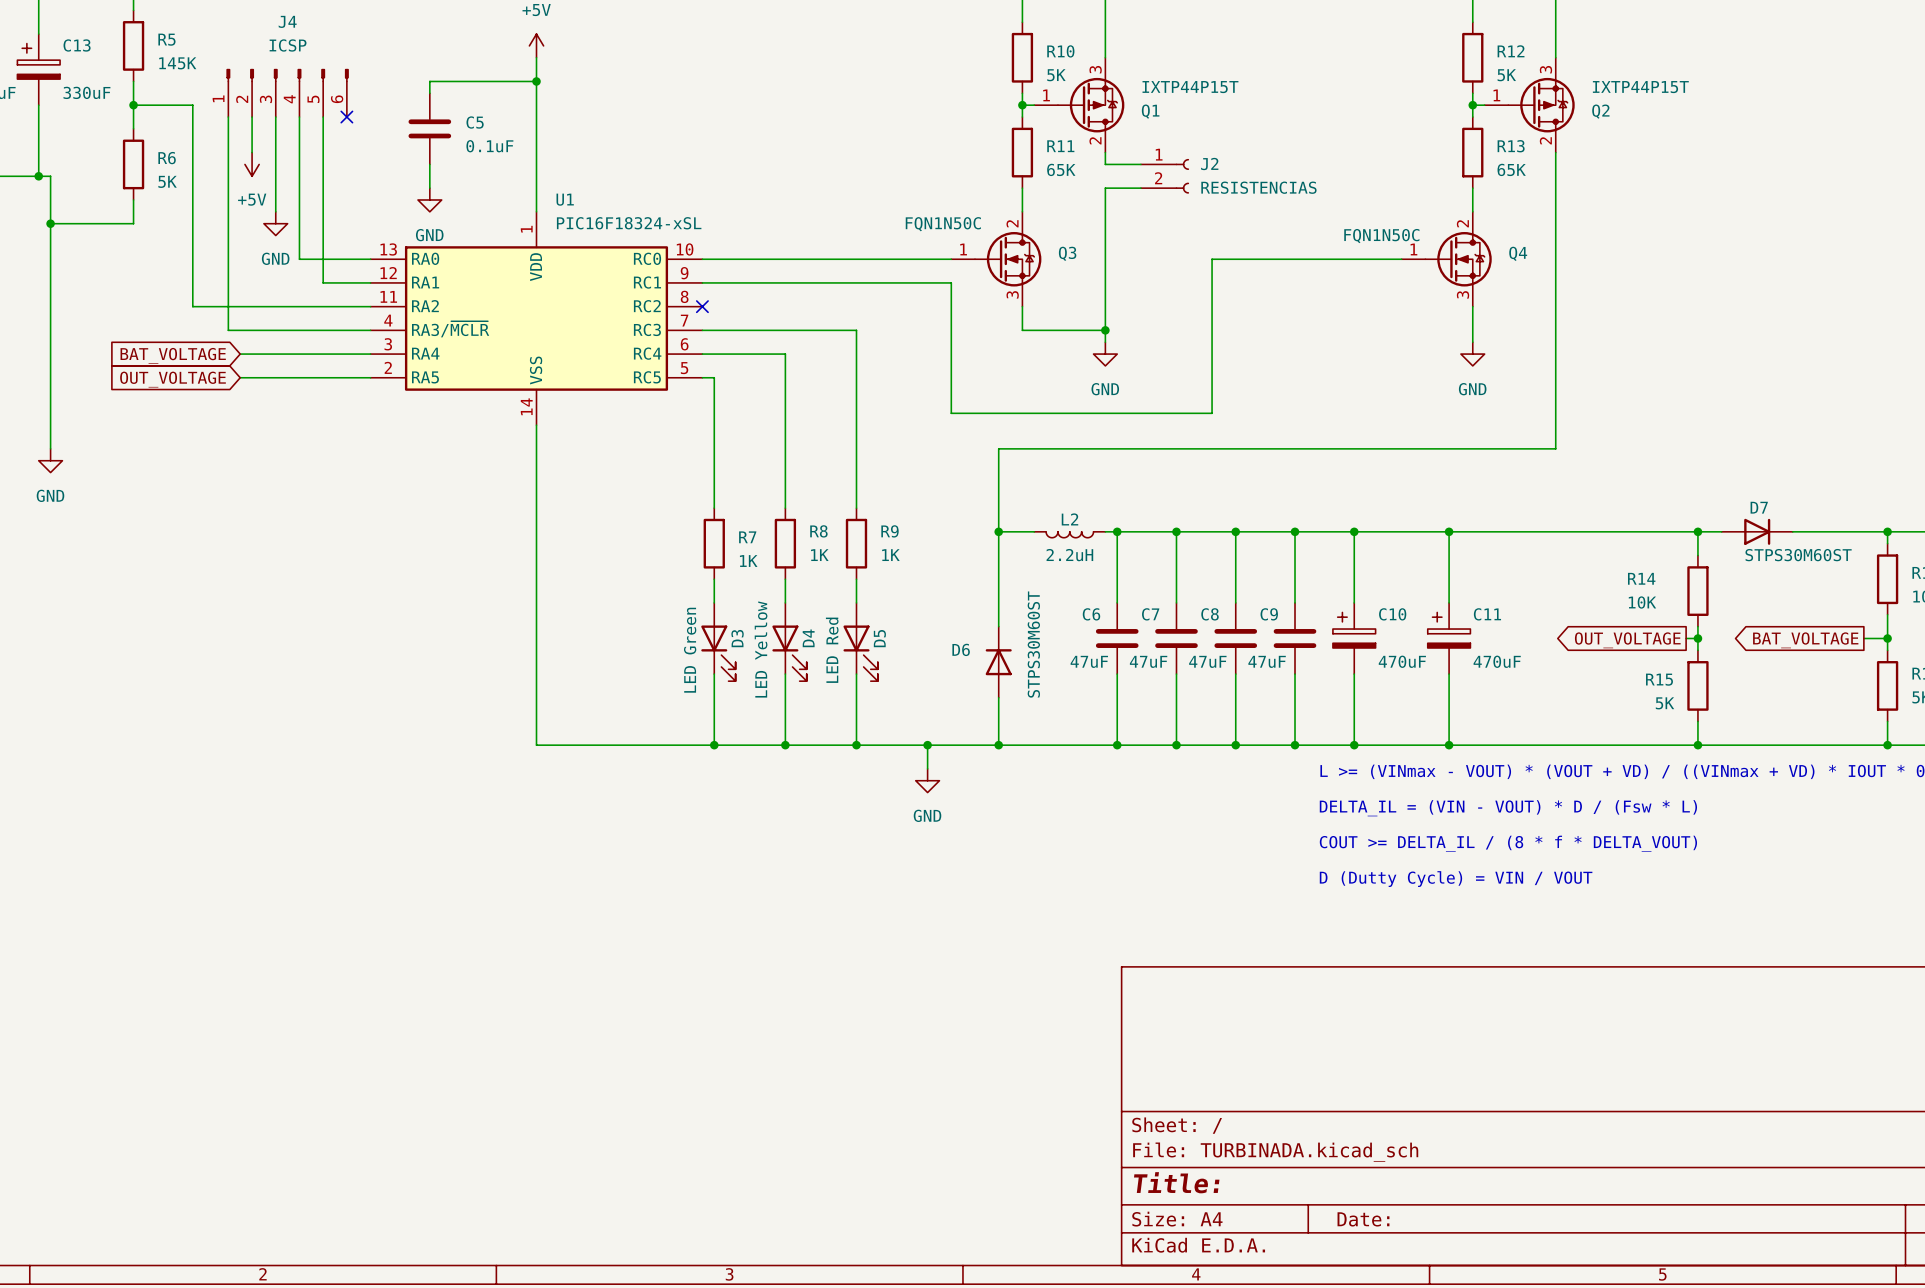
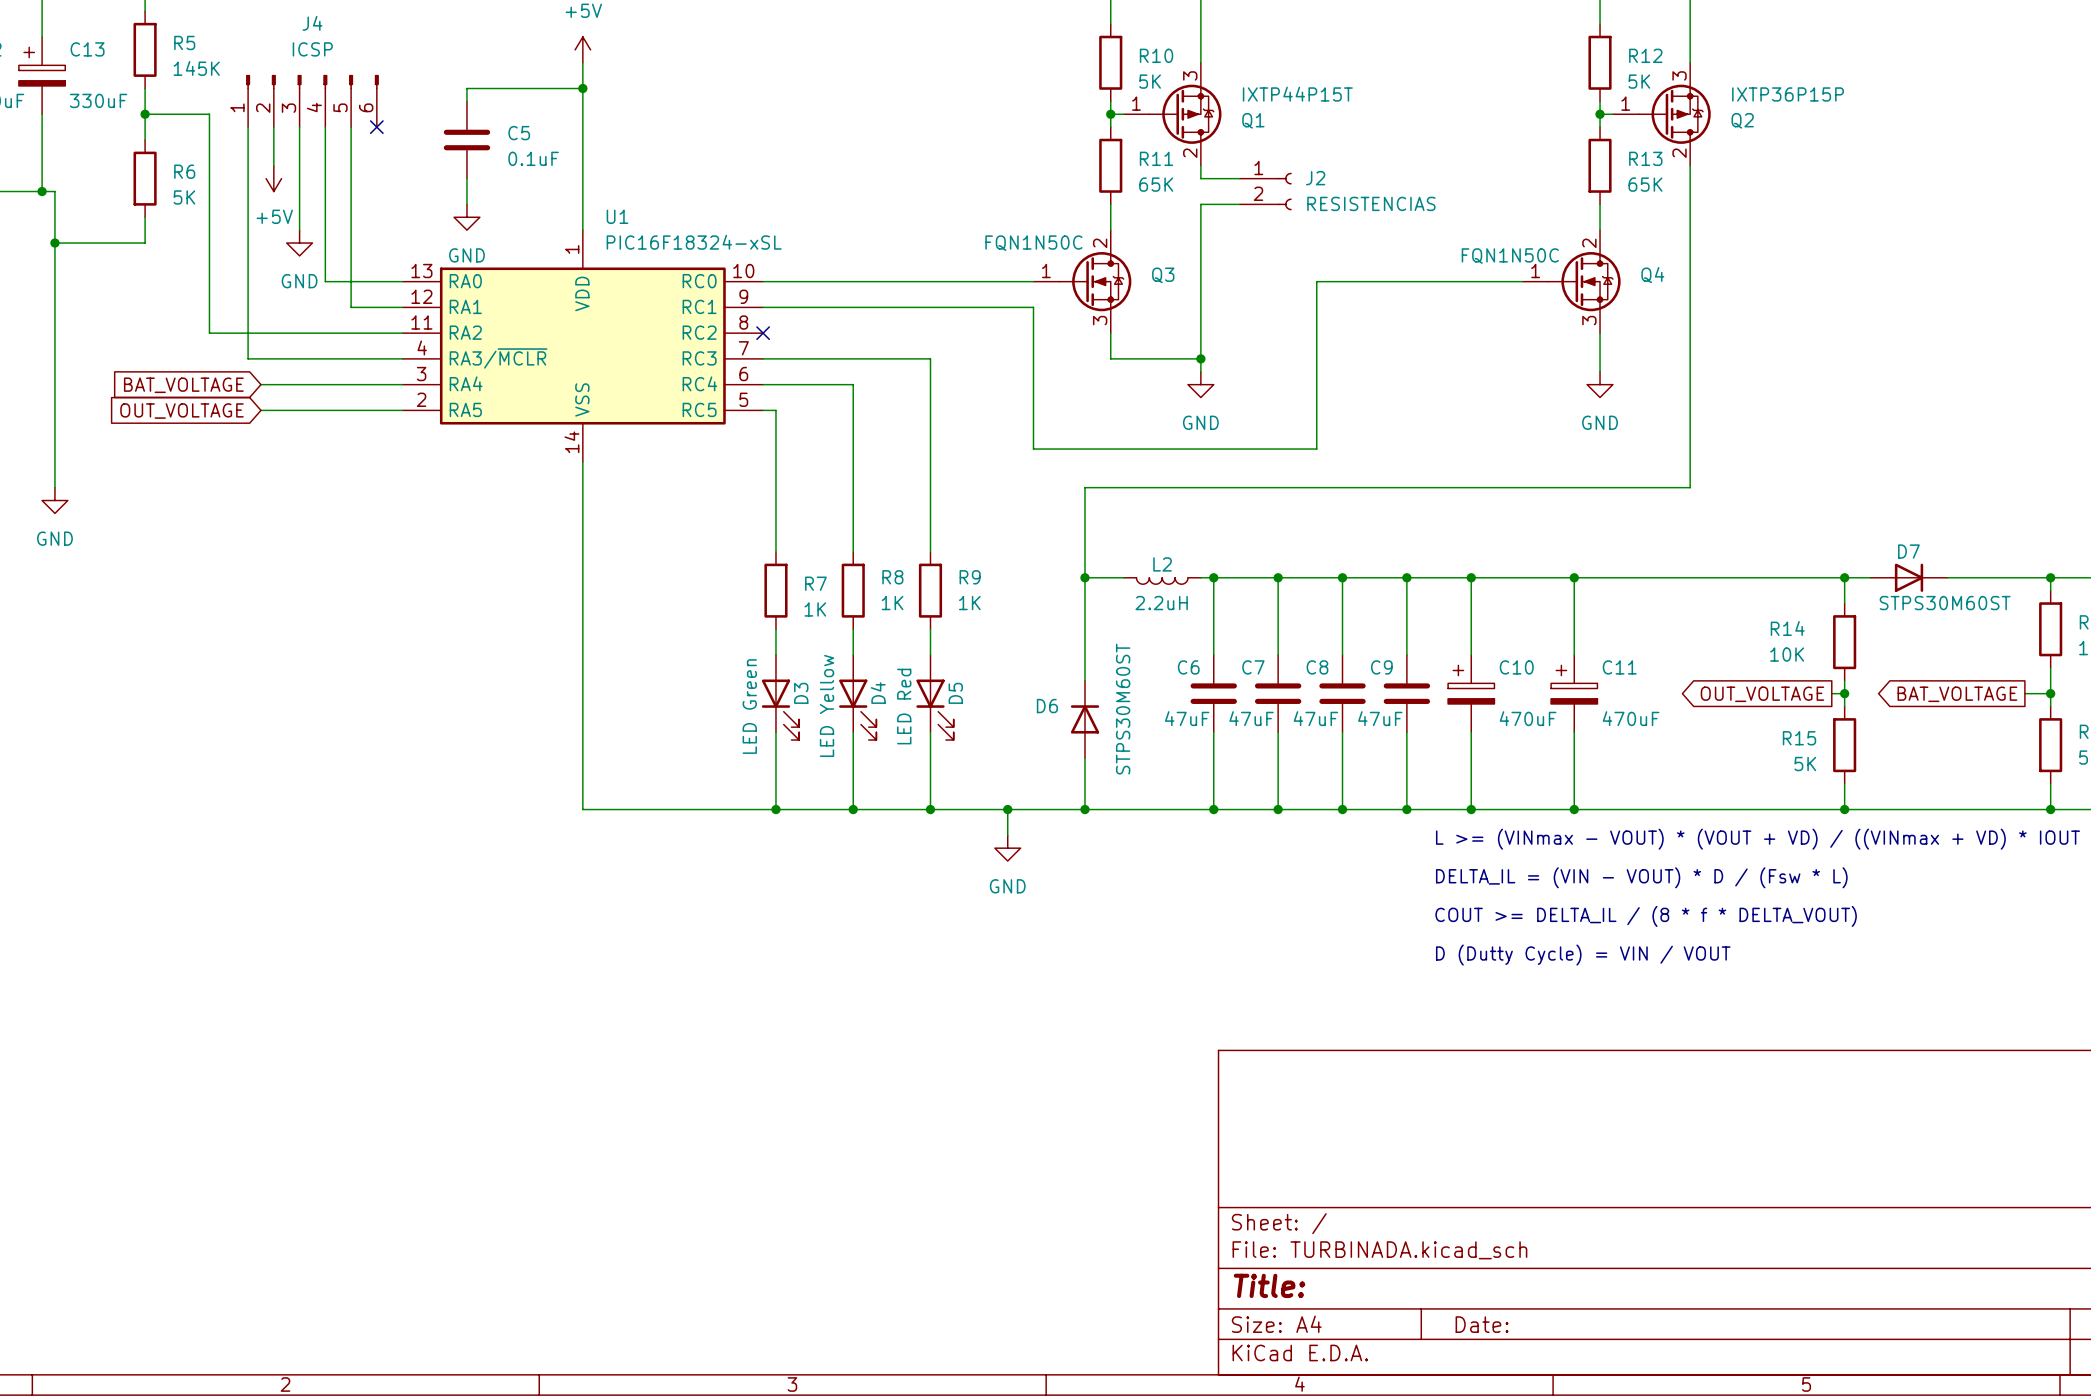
Q2 value: IXTP44P15T (1640, 87) -> IXTP36P15P (1788, 94)

